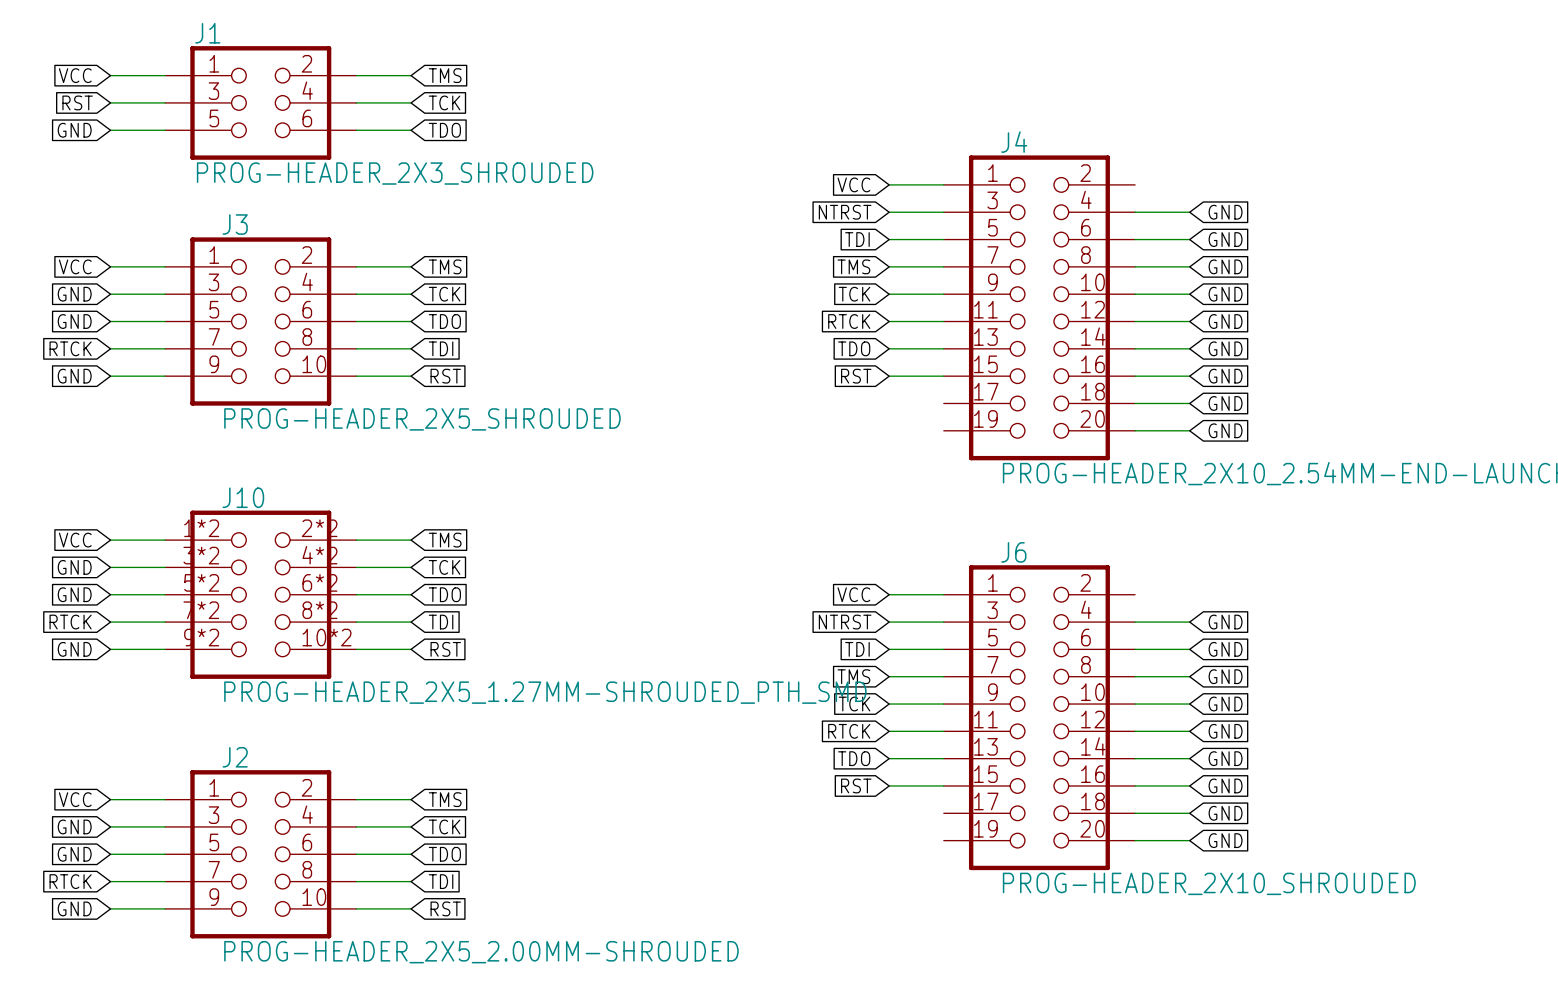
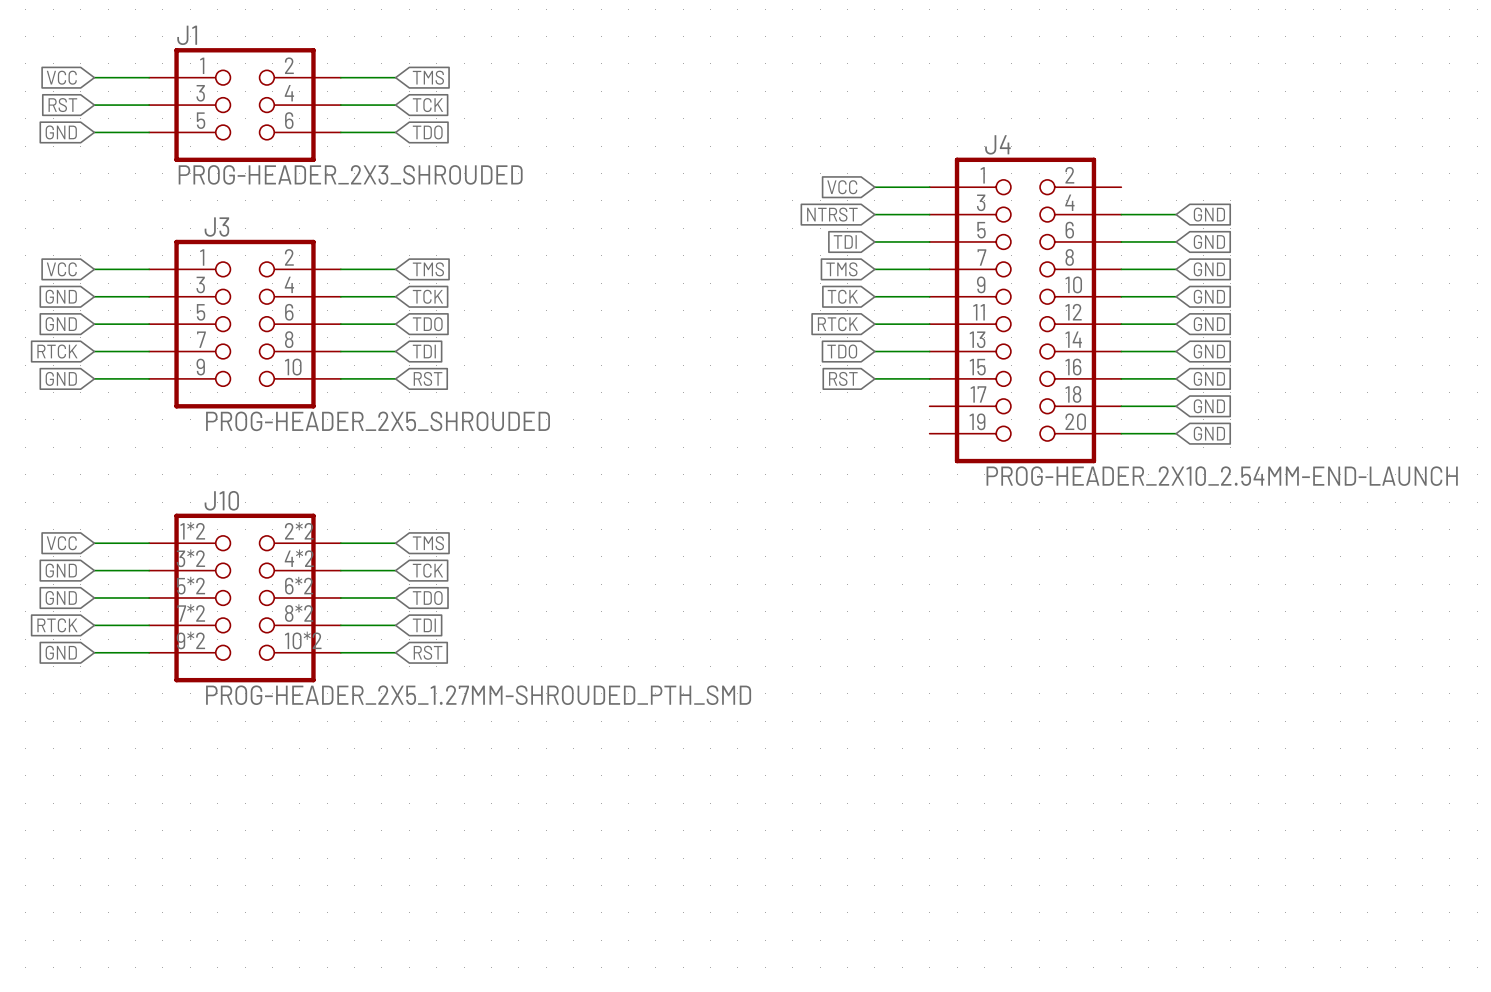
global label: VCC (853, 594) -> none
wire: (889, 594) (943, 594) -> none
global label: NTRST (845, 622) -> none
wire: (889, 622) (943, 622) -> none
wire: (1135, 622) (1189, 622) -> none
global label: GND (1225, 622) -> none
global label: TDI (857, 649) -> none
wire: (889, 649) (943, 649) -> none
wire: (1135, 649) (1189, 649) -> none
global label: GND (1225, 649) -> none
global label: TMS (853, 676) -> none
wire: (889, 676) (943, 676) -> none
wire: (1135, 676) (1189, 676) -> none
global label: GND (1225, 676) -> none
global label: TCK (854, 704) -> none
wire: (889, 704) (943, 704) -> none
wire: (1135, 704) (1189, 704) -> none
global label: GND (1225, 704) -> none
J6: PROG-HEADER_2X10_SHROUDED (1039, 717) -> none
global label: RTCK (849, 731) -> none
wire: (889, 731) (943, 731) -> none
wire: (1135, 731) (1189, 731) -> none
global label: GND (1225, 731) -> none
global label: TDO (854, 758) -> none
wire: (889, 758) (943, 758) -> none
wire: (1135, 758) (1189, 758) -> none
global label: GND (1225, 758) -> none
global label: RST (856, 785) -> none
wire: (889, 785) (943, 785) -> none
wire: (1135, 785) (1189, 785) -> none
global label: GND (1225, 785) -> none
global label: VCC (75, 799) -> none
wire: (110, 799) (165, 799) -> none
wire: (356, 799) (411, 799) -> none
global label: TMS (445, 799) -> none
wire: (1135, 813) (1189, 813) -> none
global label: GND (1225, 813) -> none
global label: GND (74, 826) -> none
wire: (110, 826) (165, 826) -> none
wire: (356, 826) (411, 826) -> none
global label: TCK (444, 826) -> none
wire: (1135, 840) (1189, 840) -> none
global label: GND (1225, 840) -> none
global label: GND (74, 854) -> none
wire: (110, 854) (165, 854) -> none
J2: PROG-HEADER_2X5_2.00MM-SHROUDED (260, 854) -> none
wire: (356, 854) (411, 854) -> none
global label: TDO (444, 854) -> none
global label: RTCK (70, 881) -> none
wire: (110, 881) (165, 881) -> none
wire: (356, 881) (411, 881) -> none
global label: TDI (441, 881) -> none
global label: GND (74, 908) -> none
wire: (110, 908) (165, 908) -> none
wire: (356, 908) (411, 908) -> none
global label: RST (445, 908) -> none

